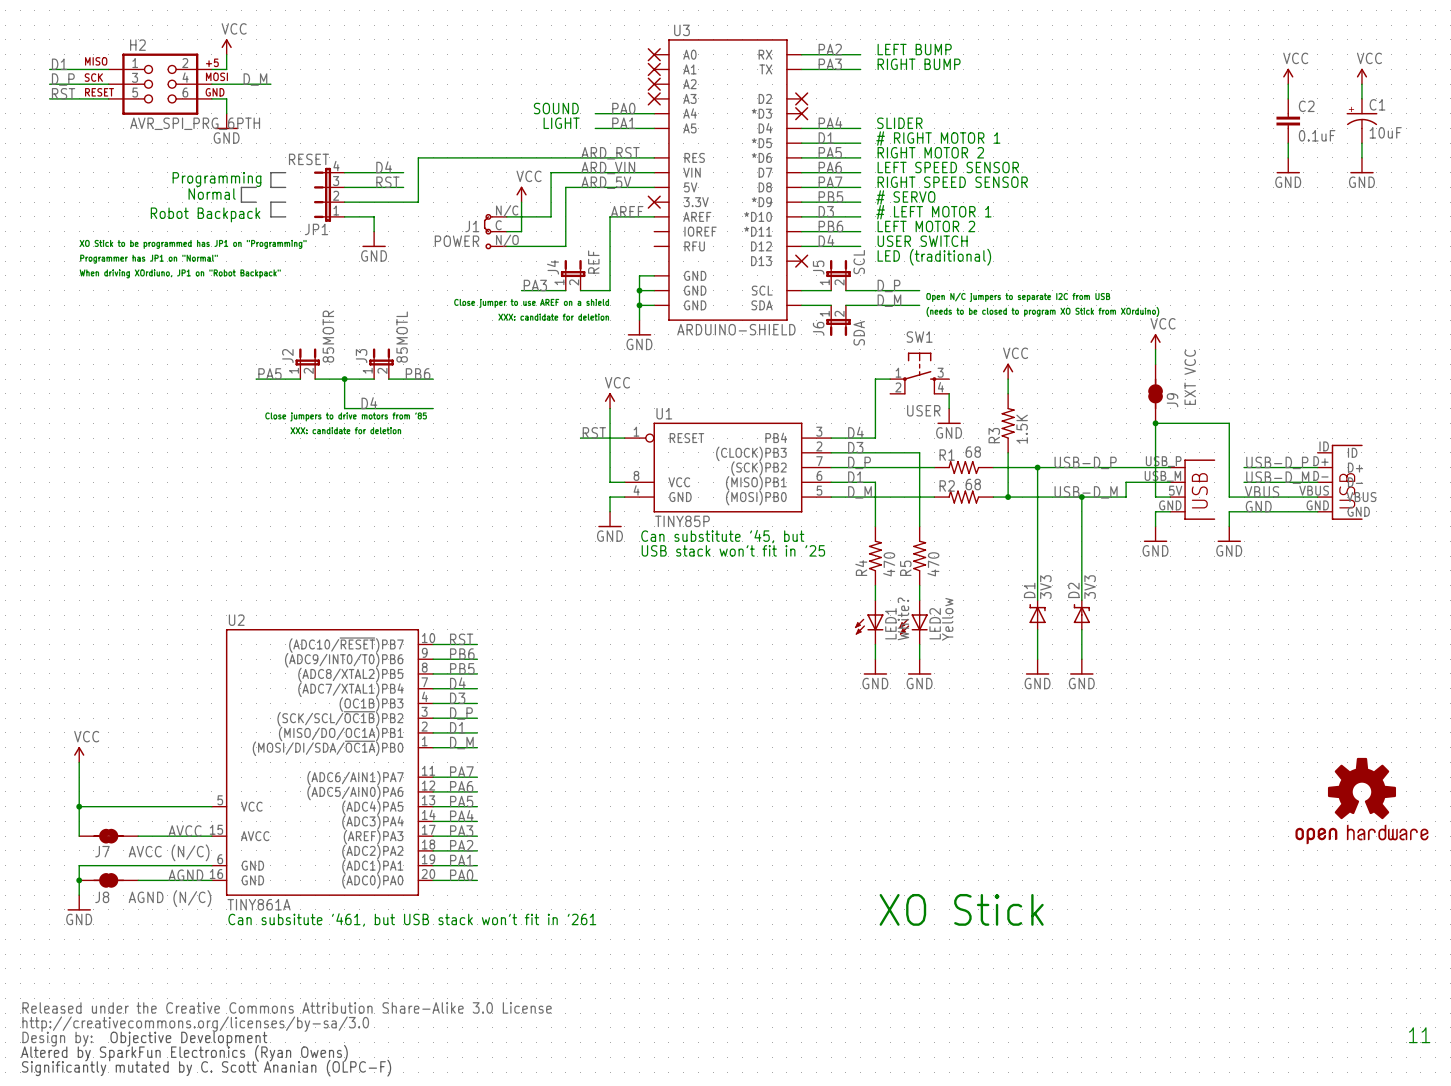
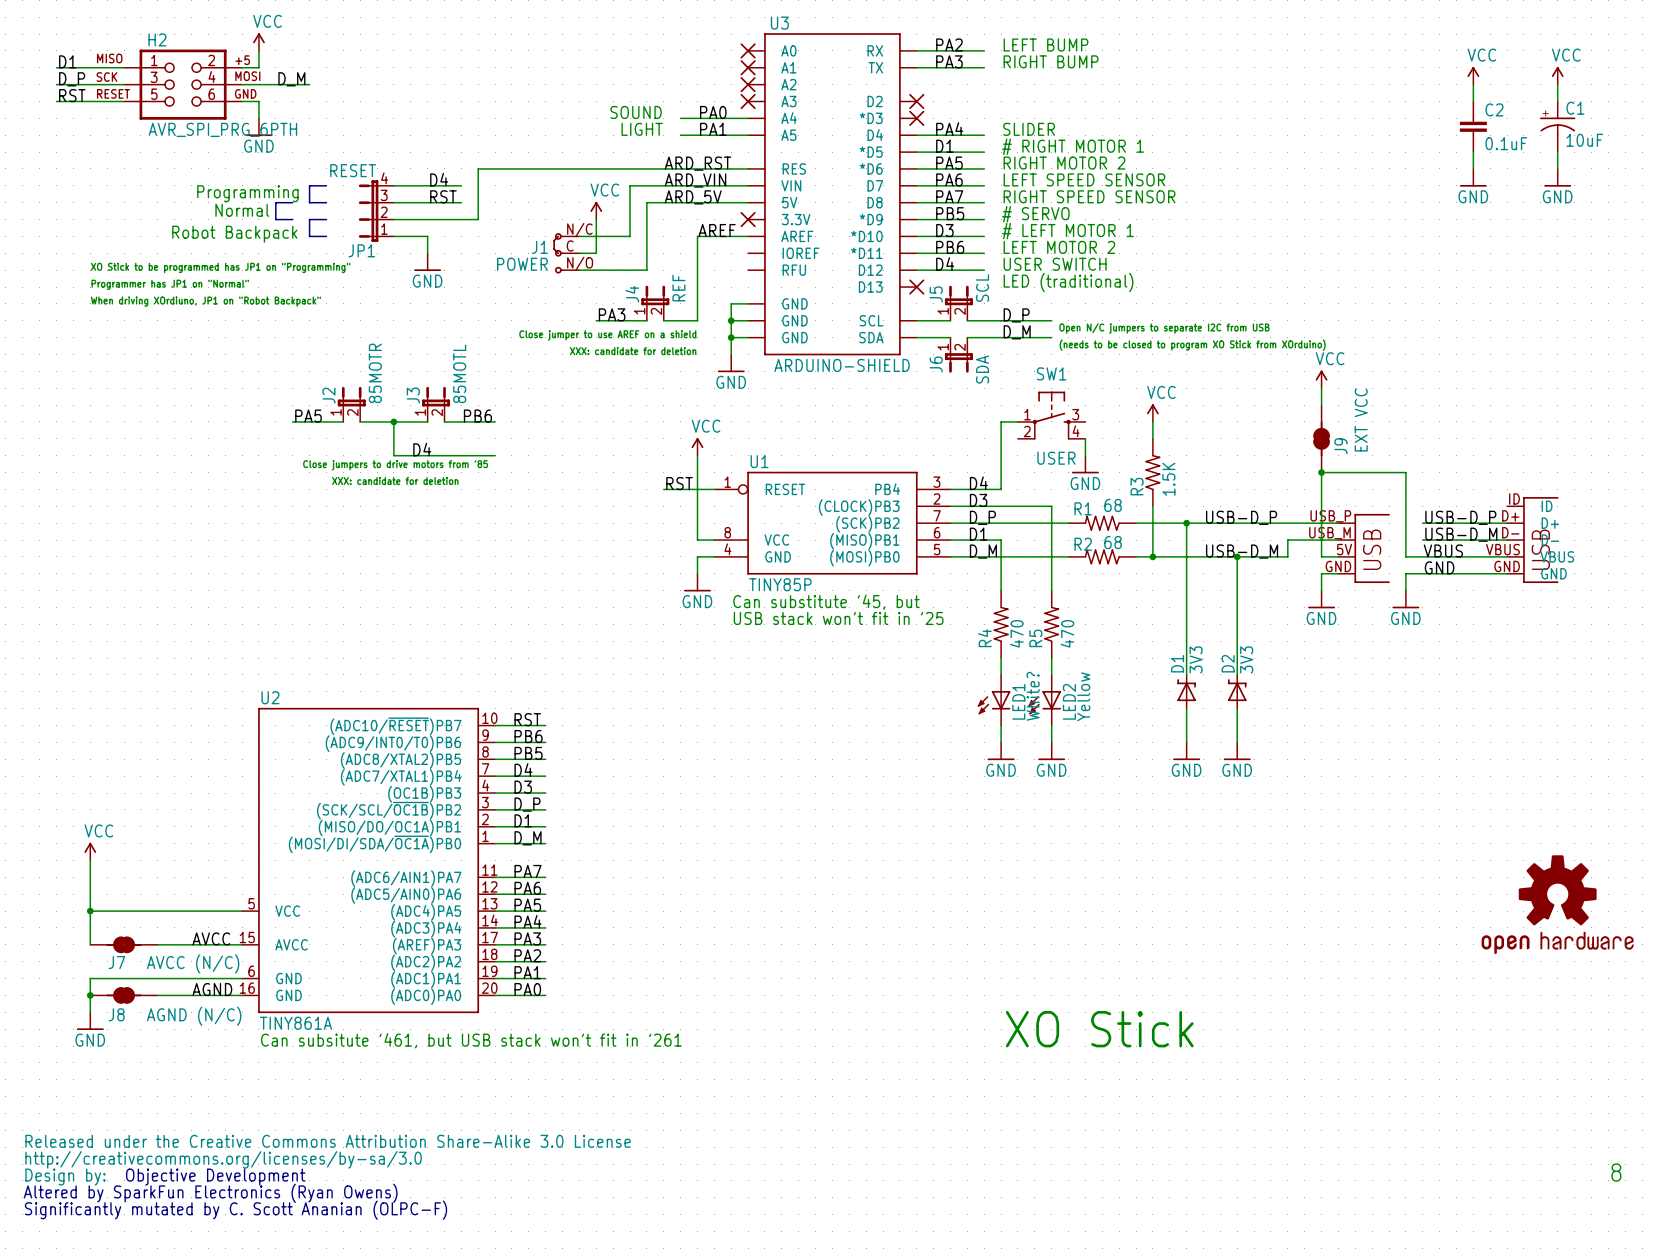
text: 11 (1419, 1035) -> 8 (1616, 1172)

